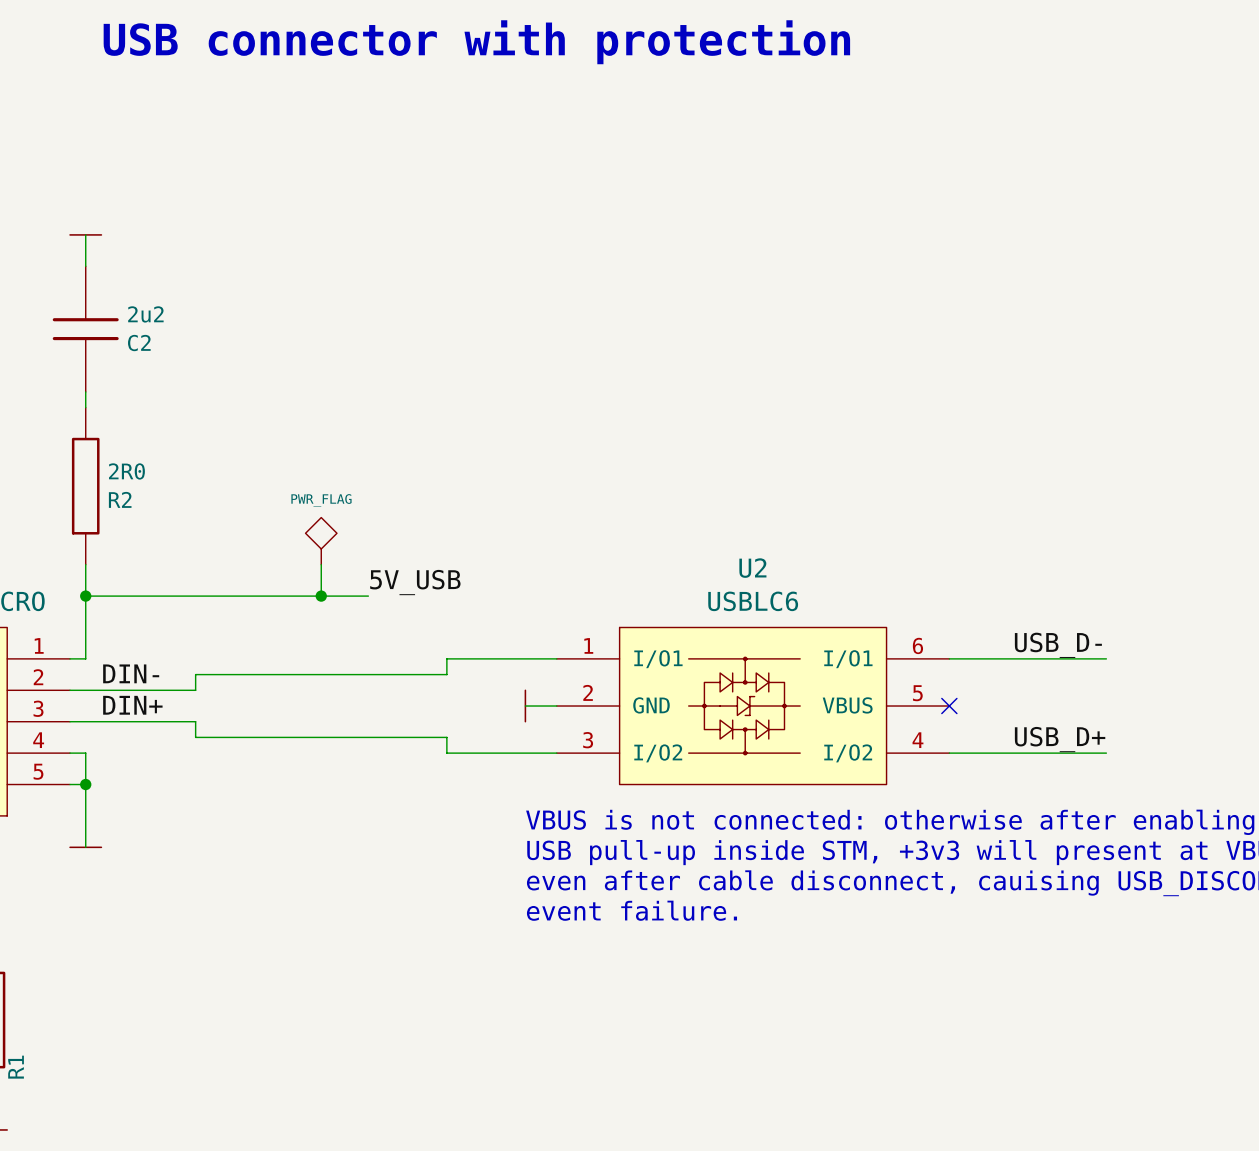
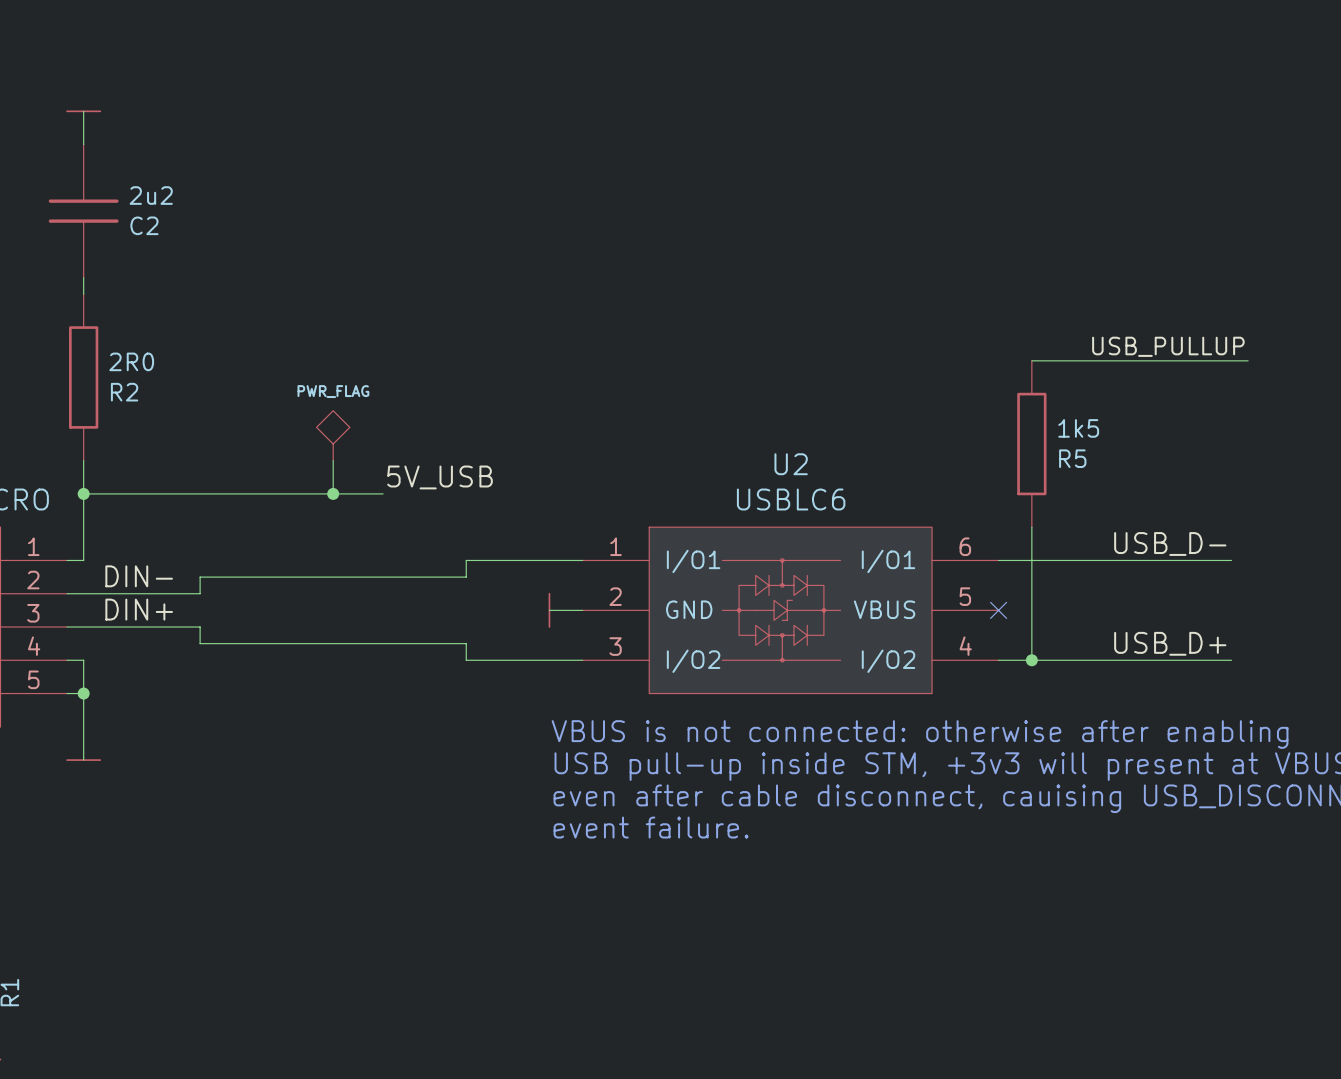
label: none -> USB_PULLUP (1168, 346)
wire: none -> (1031, 360) (1248, 360)
R5: none -> 1k5 (1031, 444)
wire: none -> (1031, 527) (1031, 660)
label position: USB_D- (1058, 645) -> USB_D- (1170, 544)
wire: none -> (1164, 560) (1231, 560)
label position: USB_D+ (1060, 739) -> USB_D+ (1170, 643)
junction: none -> (1031, 660)
wire: none -> (1164, 660) (1231, 660)

